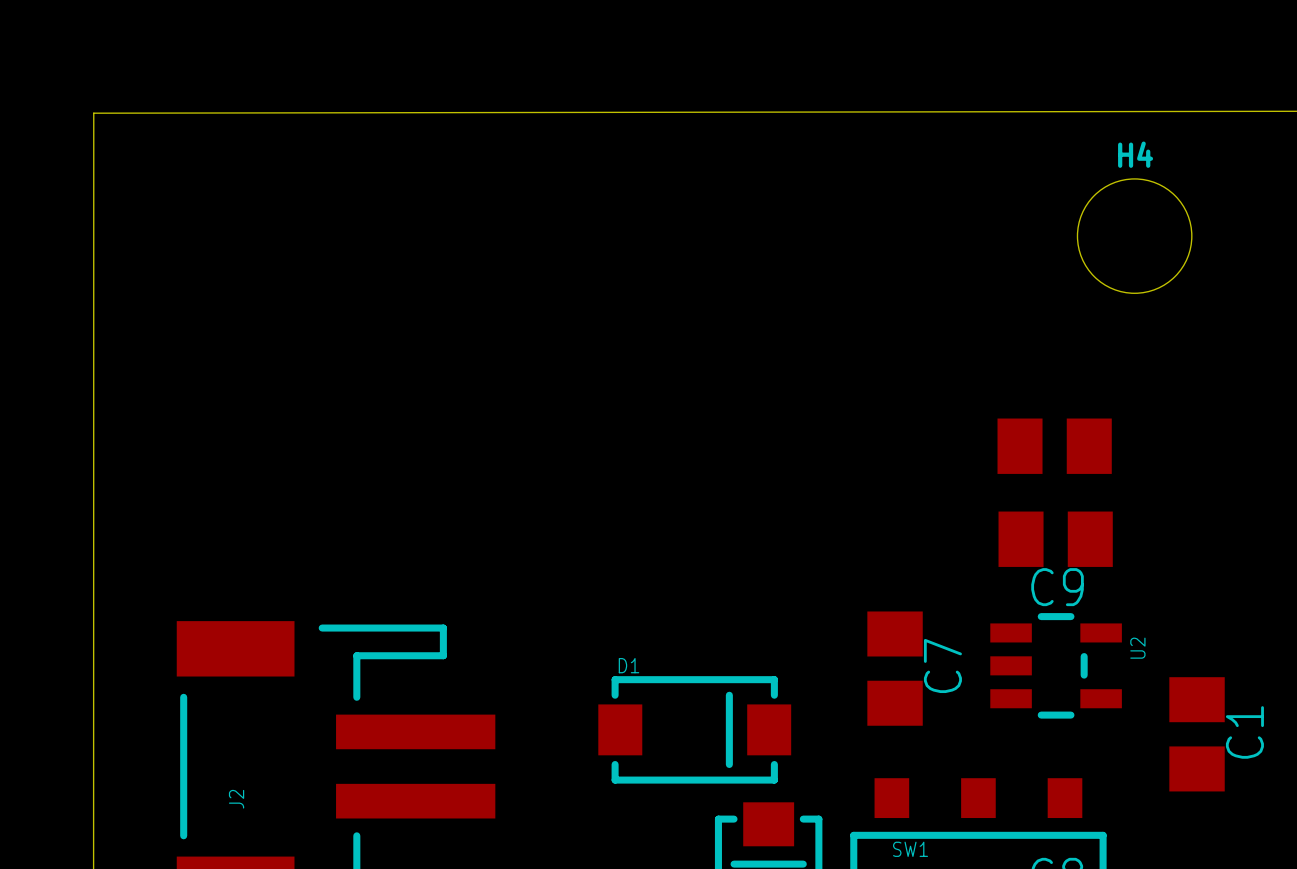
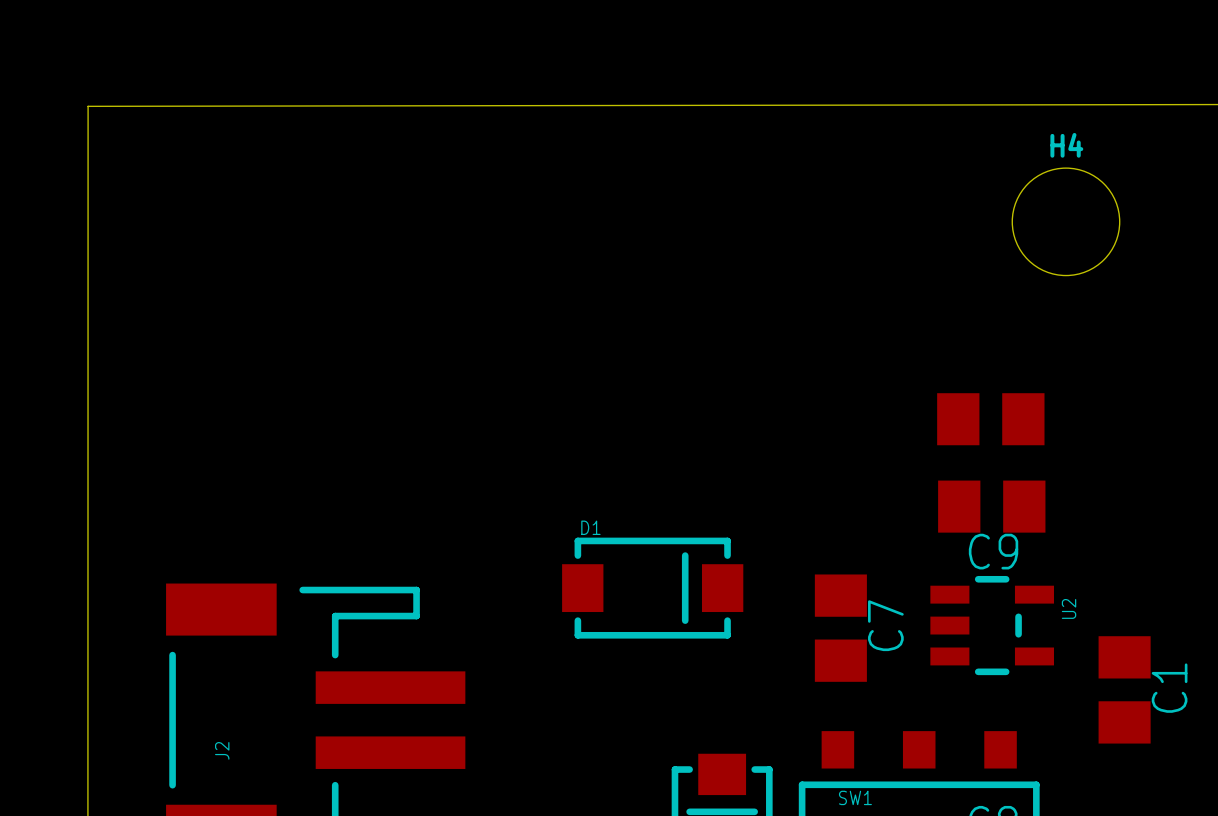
D1 position: (694, 729) -> (652, 588)

